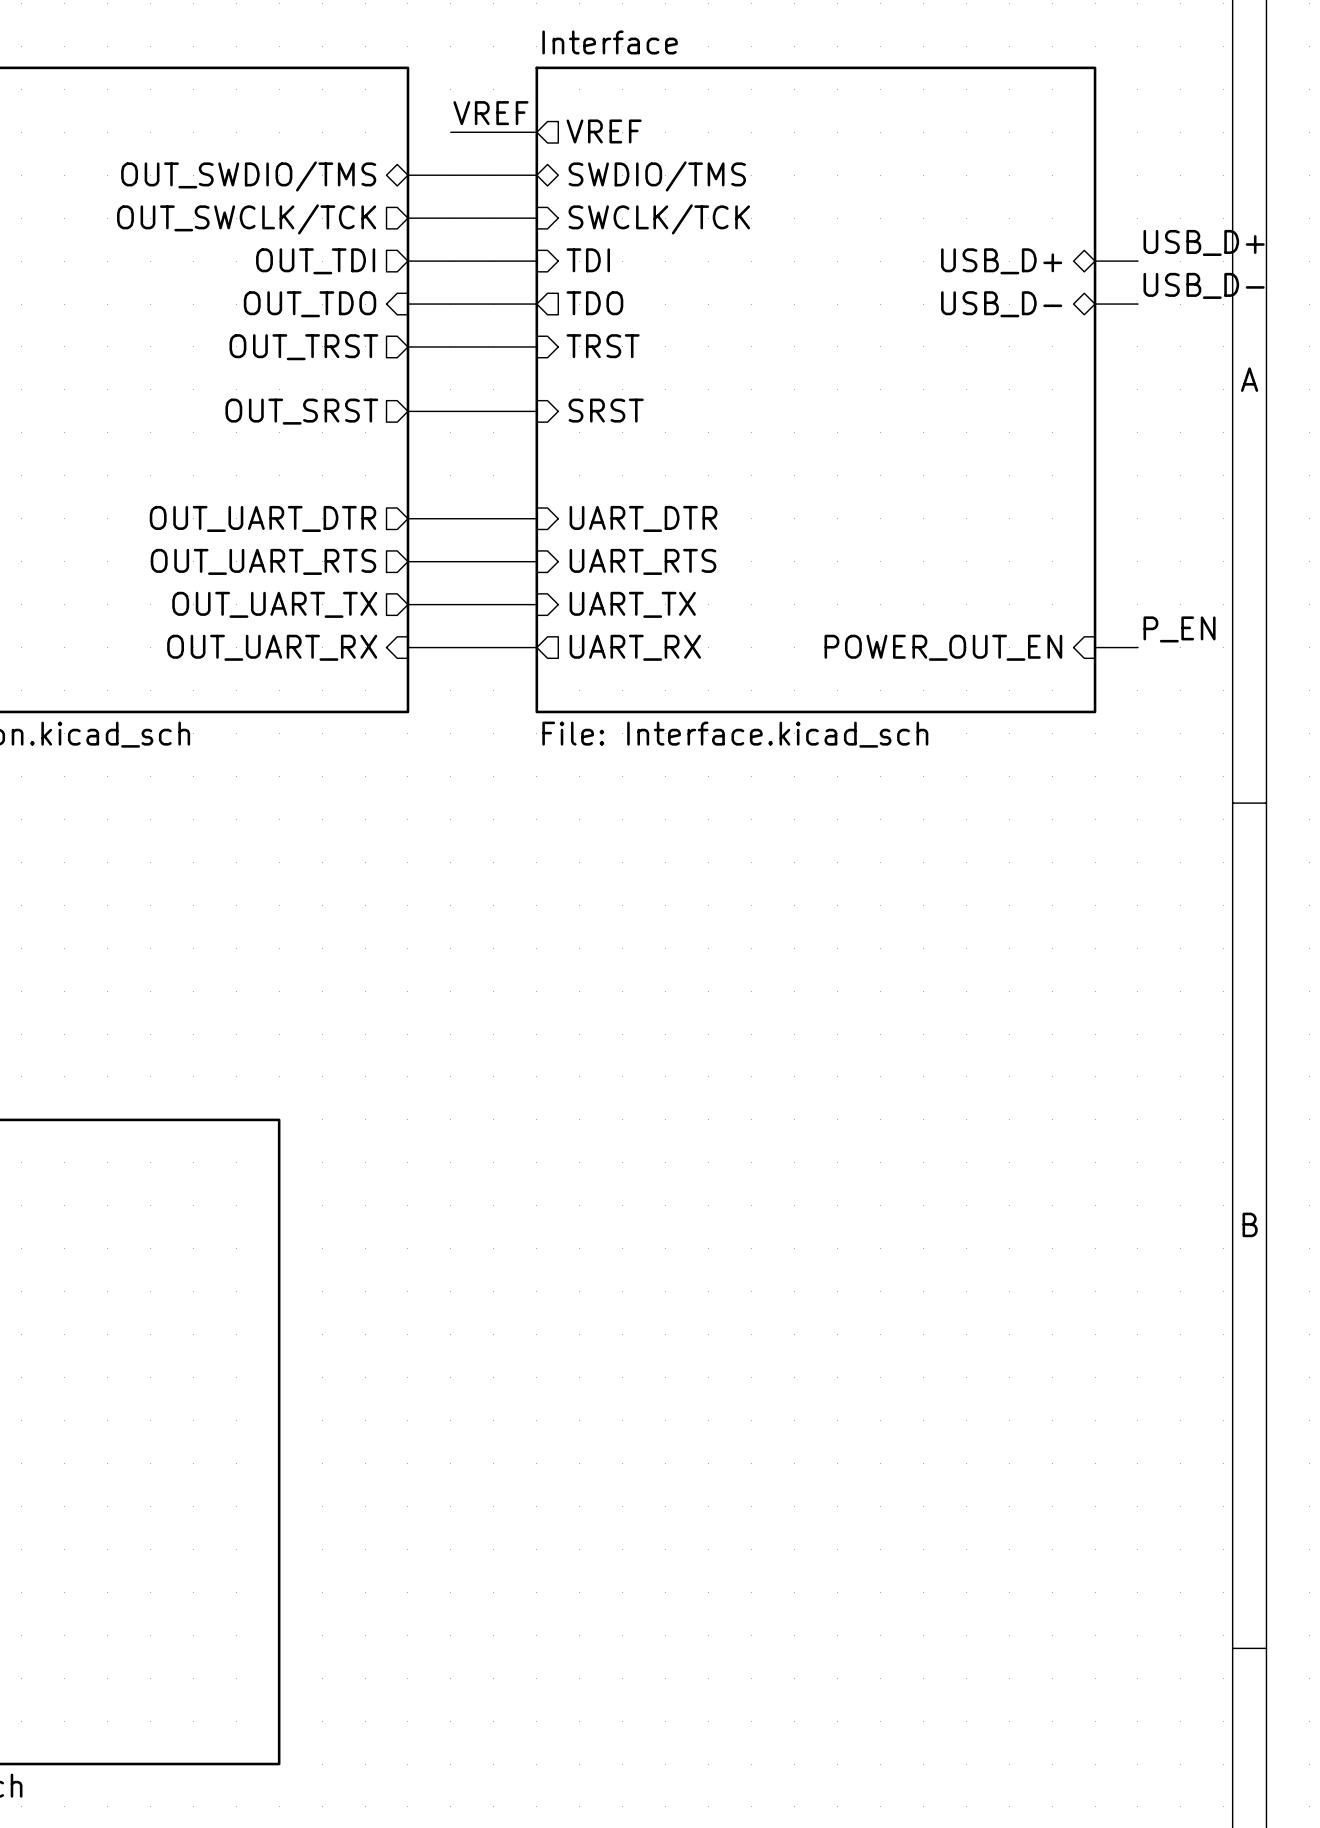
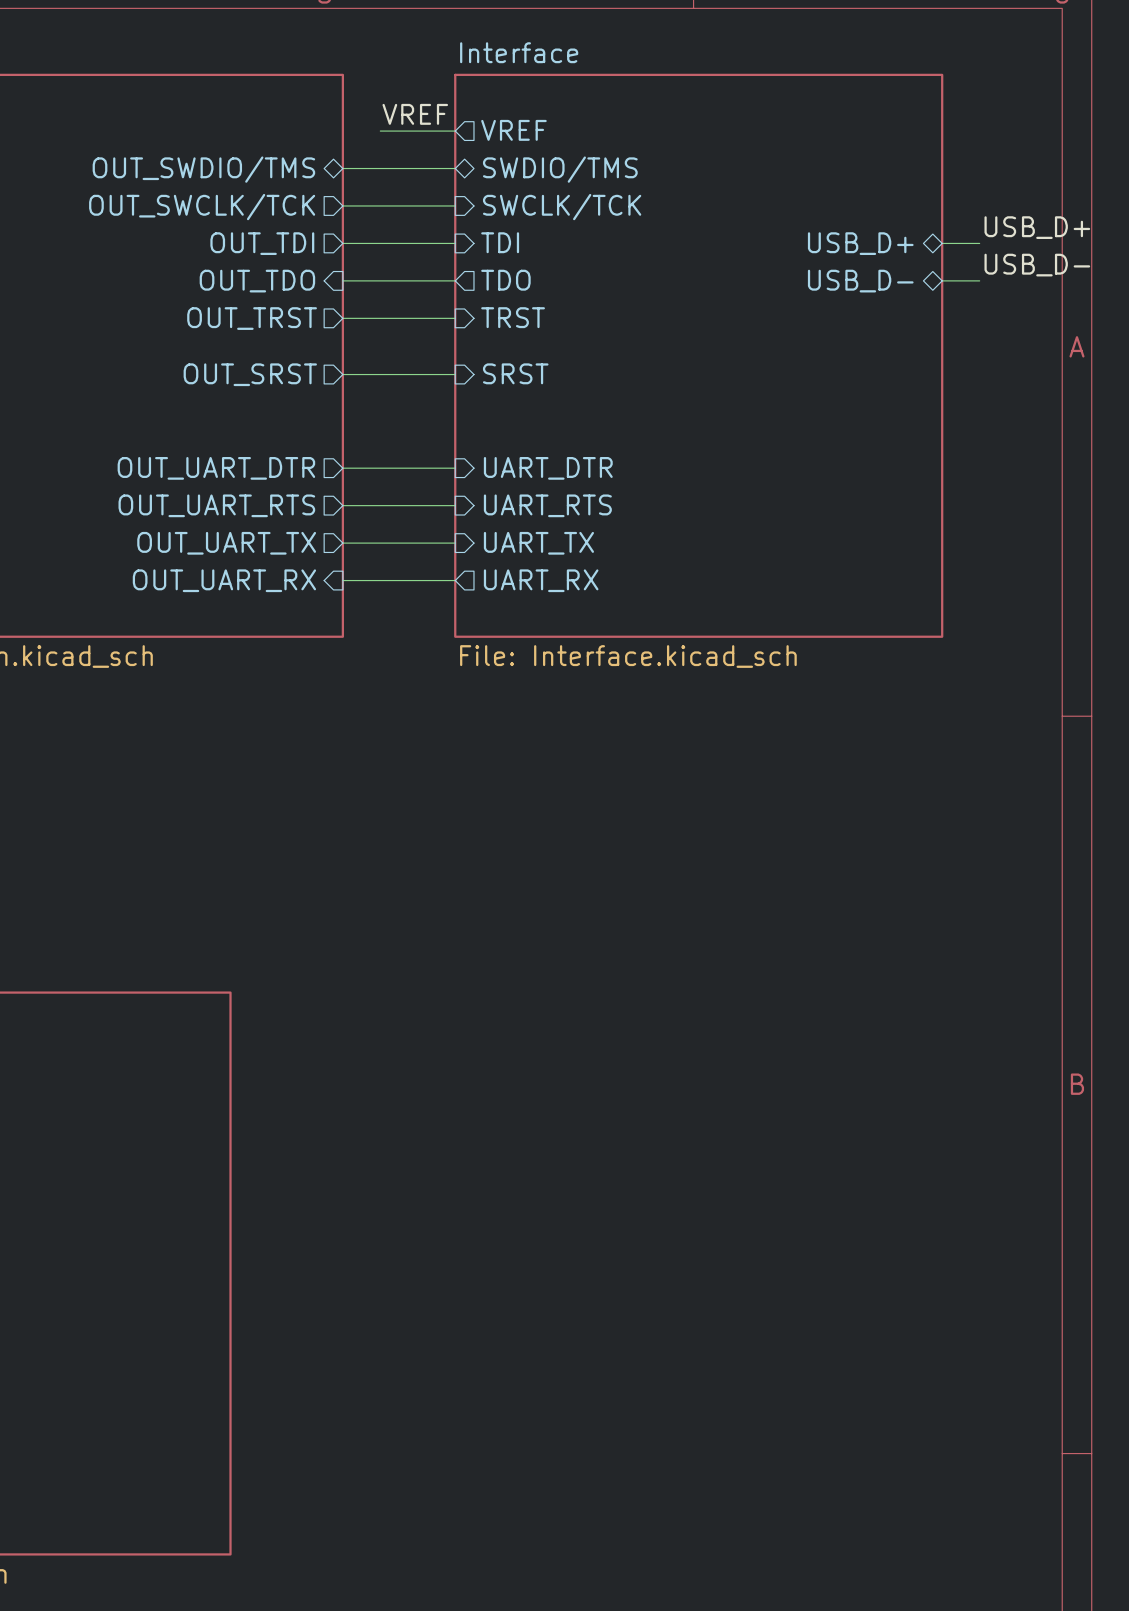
label: P_EN (1179, 629) -> none
sheet pin: POWER_OUT_EN (943, 647) -> none
wire: (1095, 647) (1137, 647) -> none

